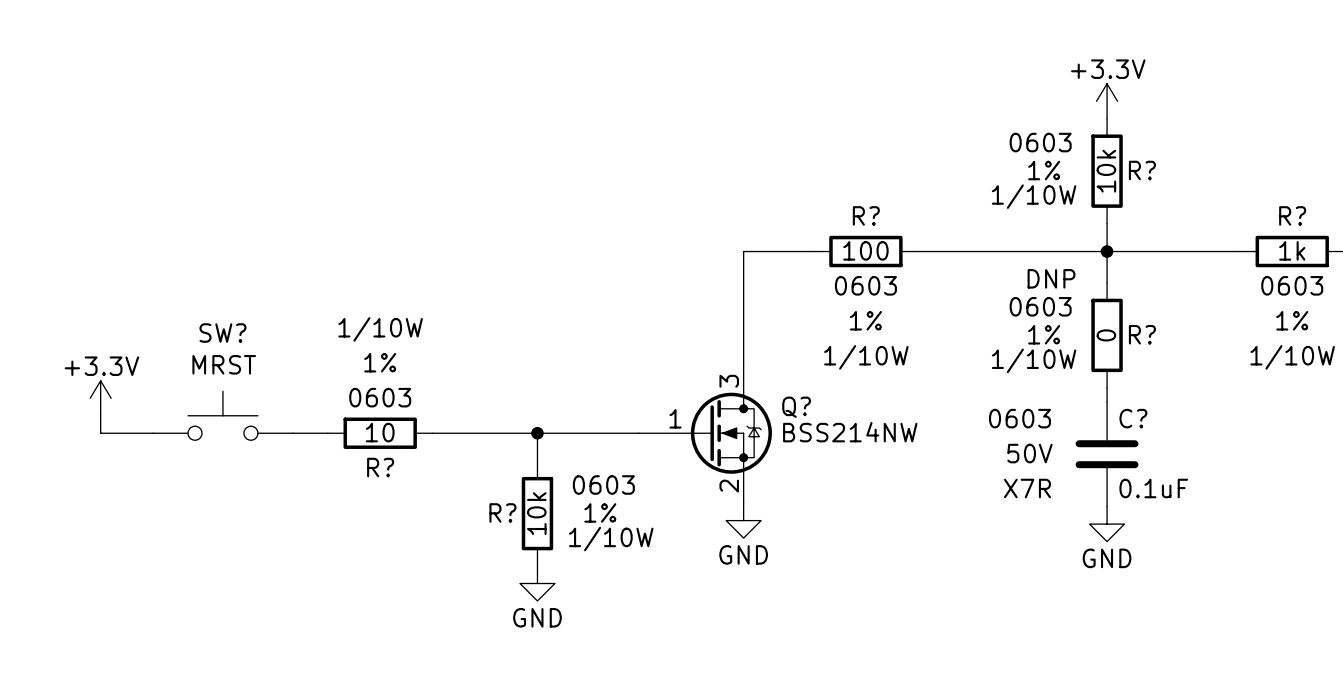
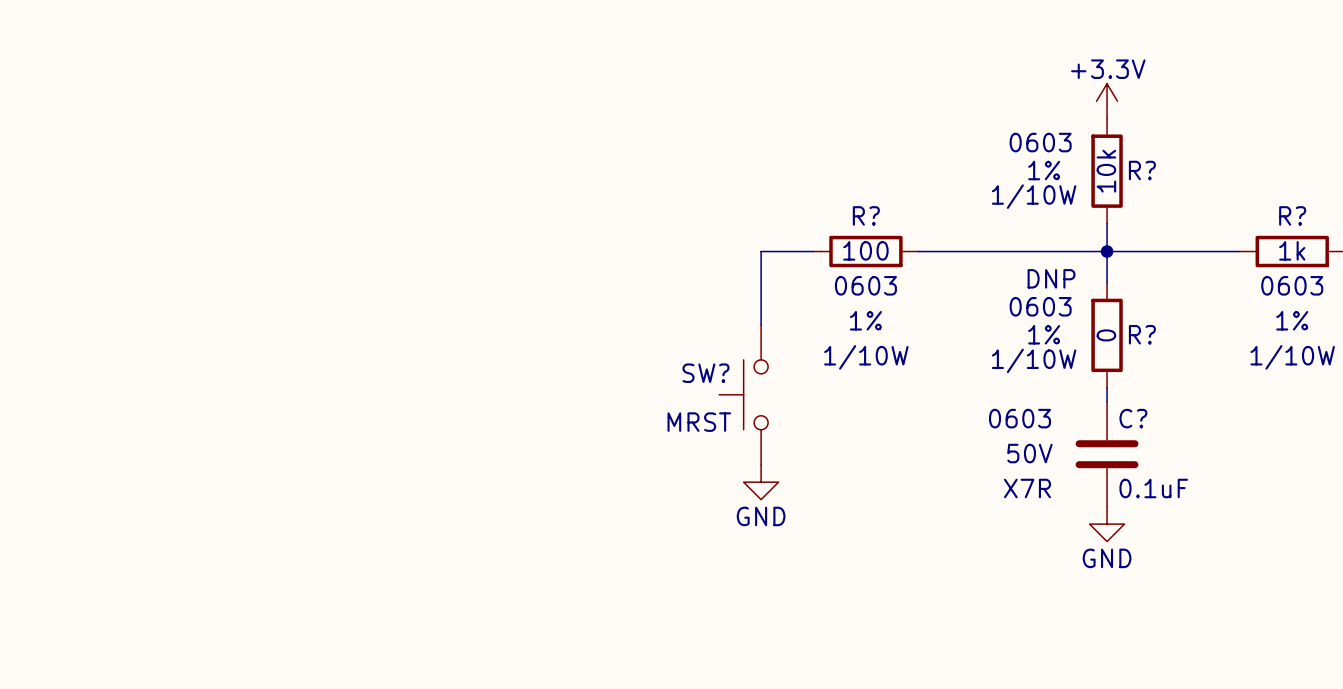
wire: (761, 251) (743, 251) (743, 363) -> (761, 251) (761, 324)
SW?: none -> MRST (743, 394)
power symbol: +3.3V (100, 398) -> none
wire: (100, 415) (100, 433) (153, 433) -> none
SW?: MRST (222, 415) -> none
wire: (292, 433) (327, 433) -> none
R?: 10 (380, 433) -> none
wire: (432, 433) (638, 433) -> none
wire: (537, 433) (537, 461) -> none
junction: (537, 433) -> none
Q?: BSS214NW (705, 433) -> none
R?: 10k (537, 513) -> none
power symbol position: GND (743, 520) -> GND (761, 482)
power symbol: GND (537, 583) -> none

